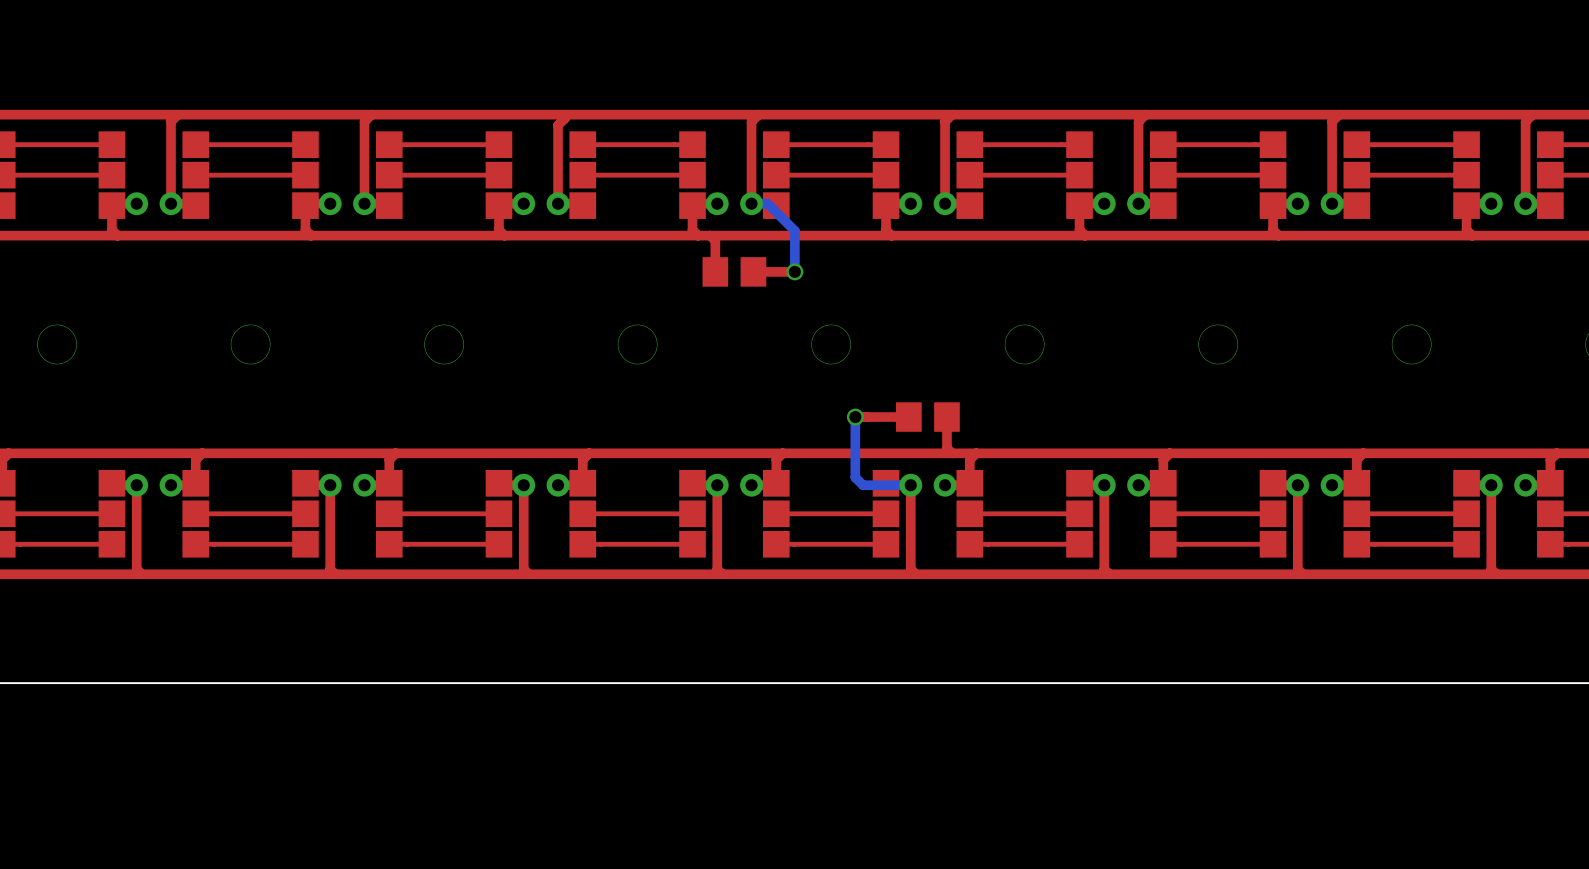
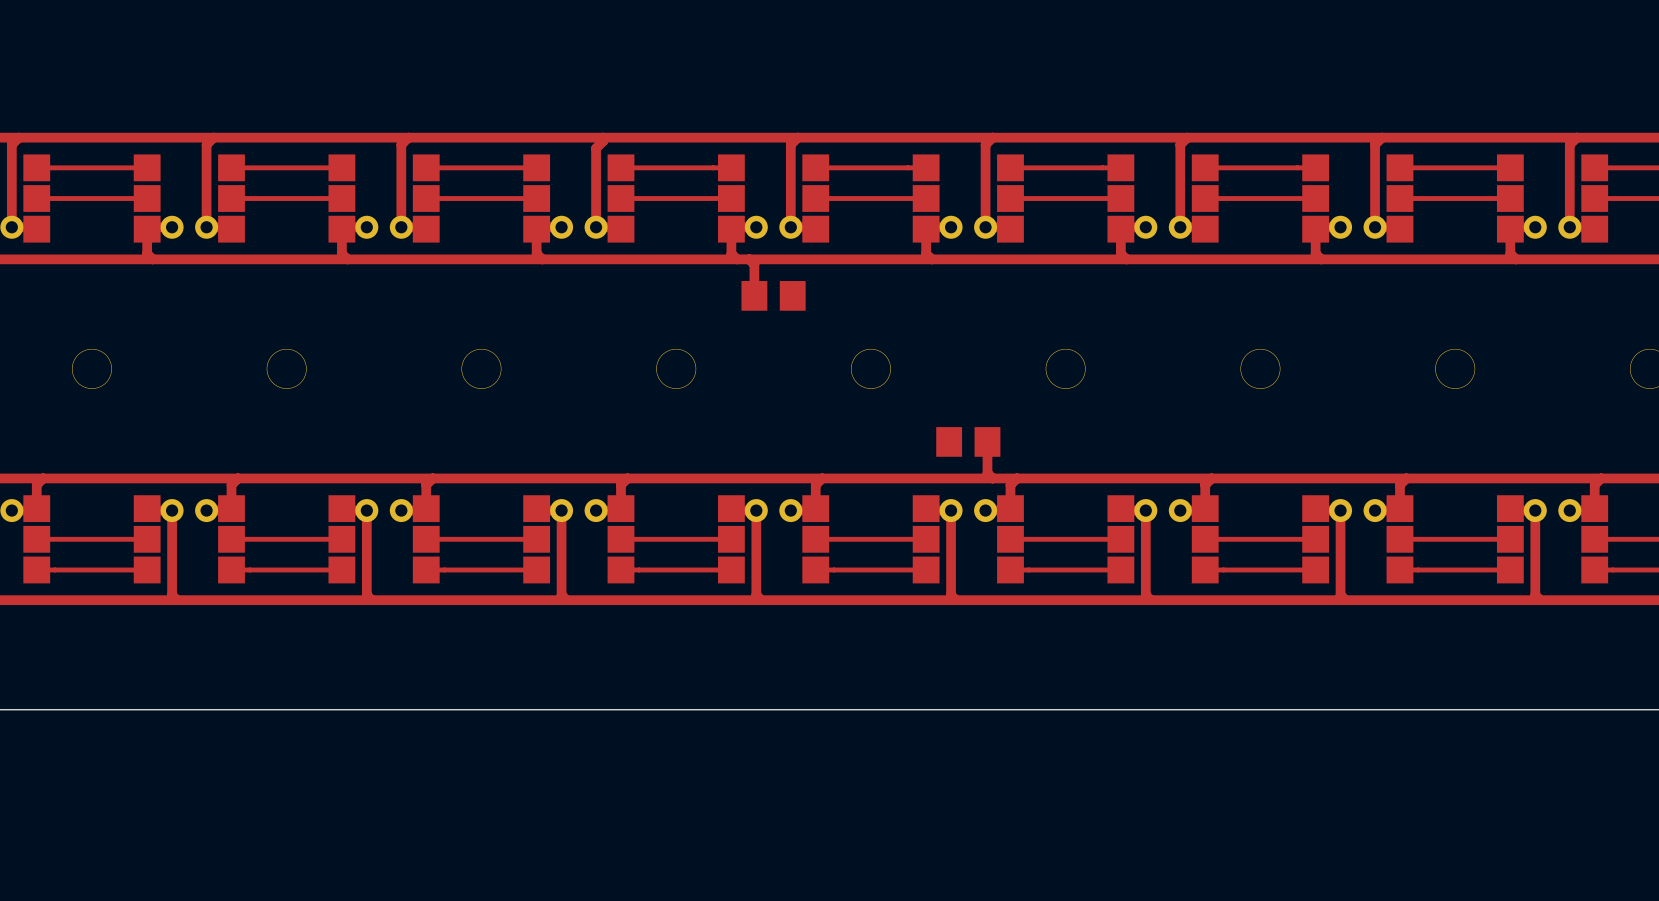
bottom track: (751, 203) (767, 203) (794, 230) (794, 271) -> none
top track: (794, 271) (753, 271) -> none
via: (794, 271) -> none
bottom track: (855, 417) (855, 477) (863, 485) (910, 485) -> none
via: (855, 417) -> none
top track: (908, 417) (855, 417) -> none

